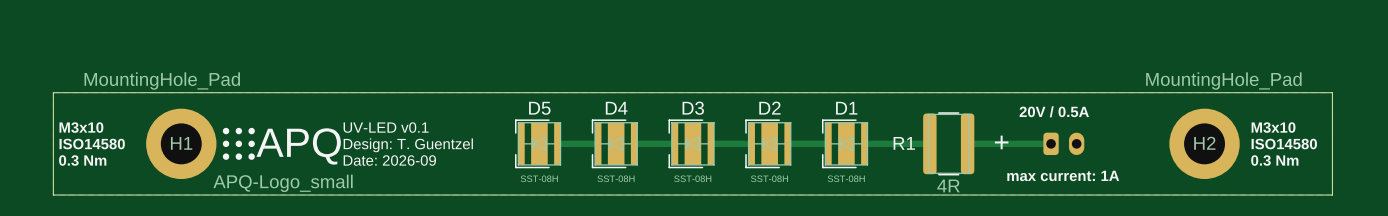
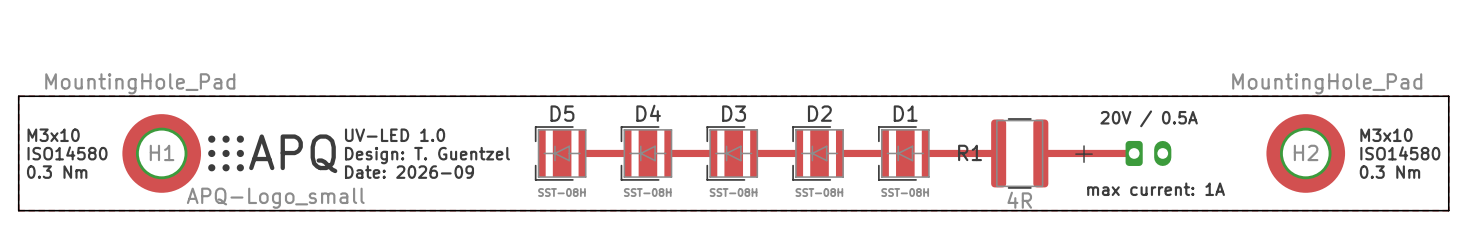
text: UV-LED v0.1 (386, 127) -> UV-LED 1.0 (395, 135)

